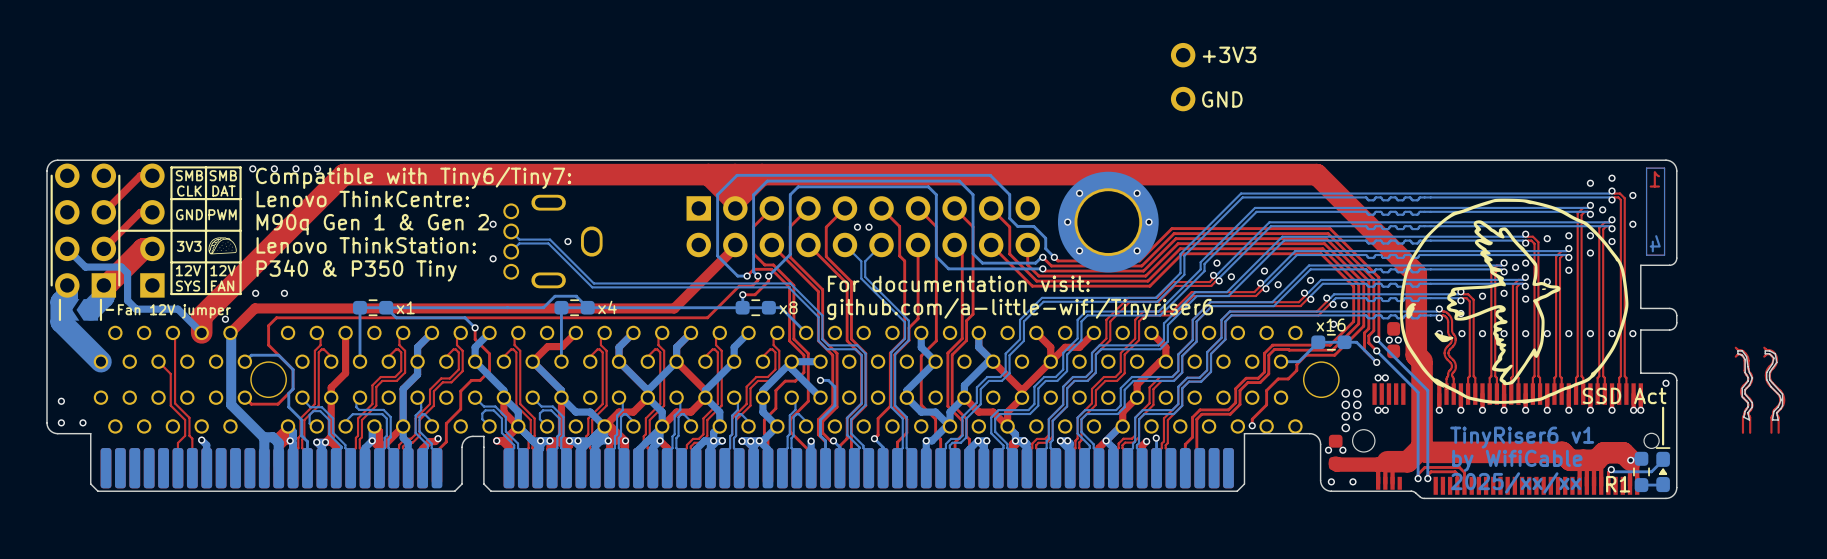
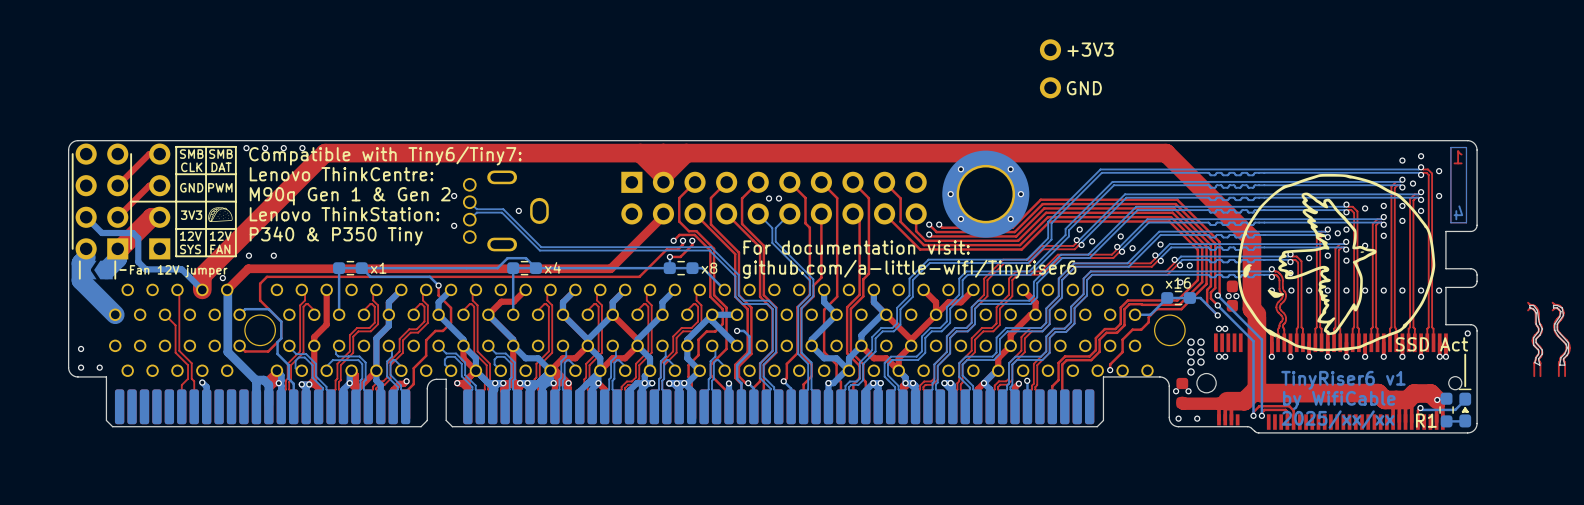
bottom track: (1042, 257) (1035, 263) (982, 263) (973, 253) (973, 194) (959, 181) (767, 181) (753, 194) (753, 271) (757, 276) -> none
bottom track: (1054, 257) (1045, 248) (1045, 238) (1033, 226) (1017, 226) (1009, 218) (1009, 194) (990, 175) (737, 175) (717, 194) (717, 255) (737, 276) (747, 276) -> none
bottom track: (1042, 268) (948, 268) (936, 256) (936, 194) (928, 186) (798, 186) (790, 194) (790, 254) (768, 276) -> none

